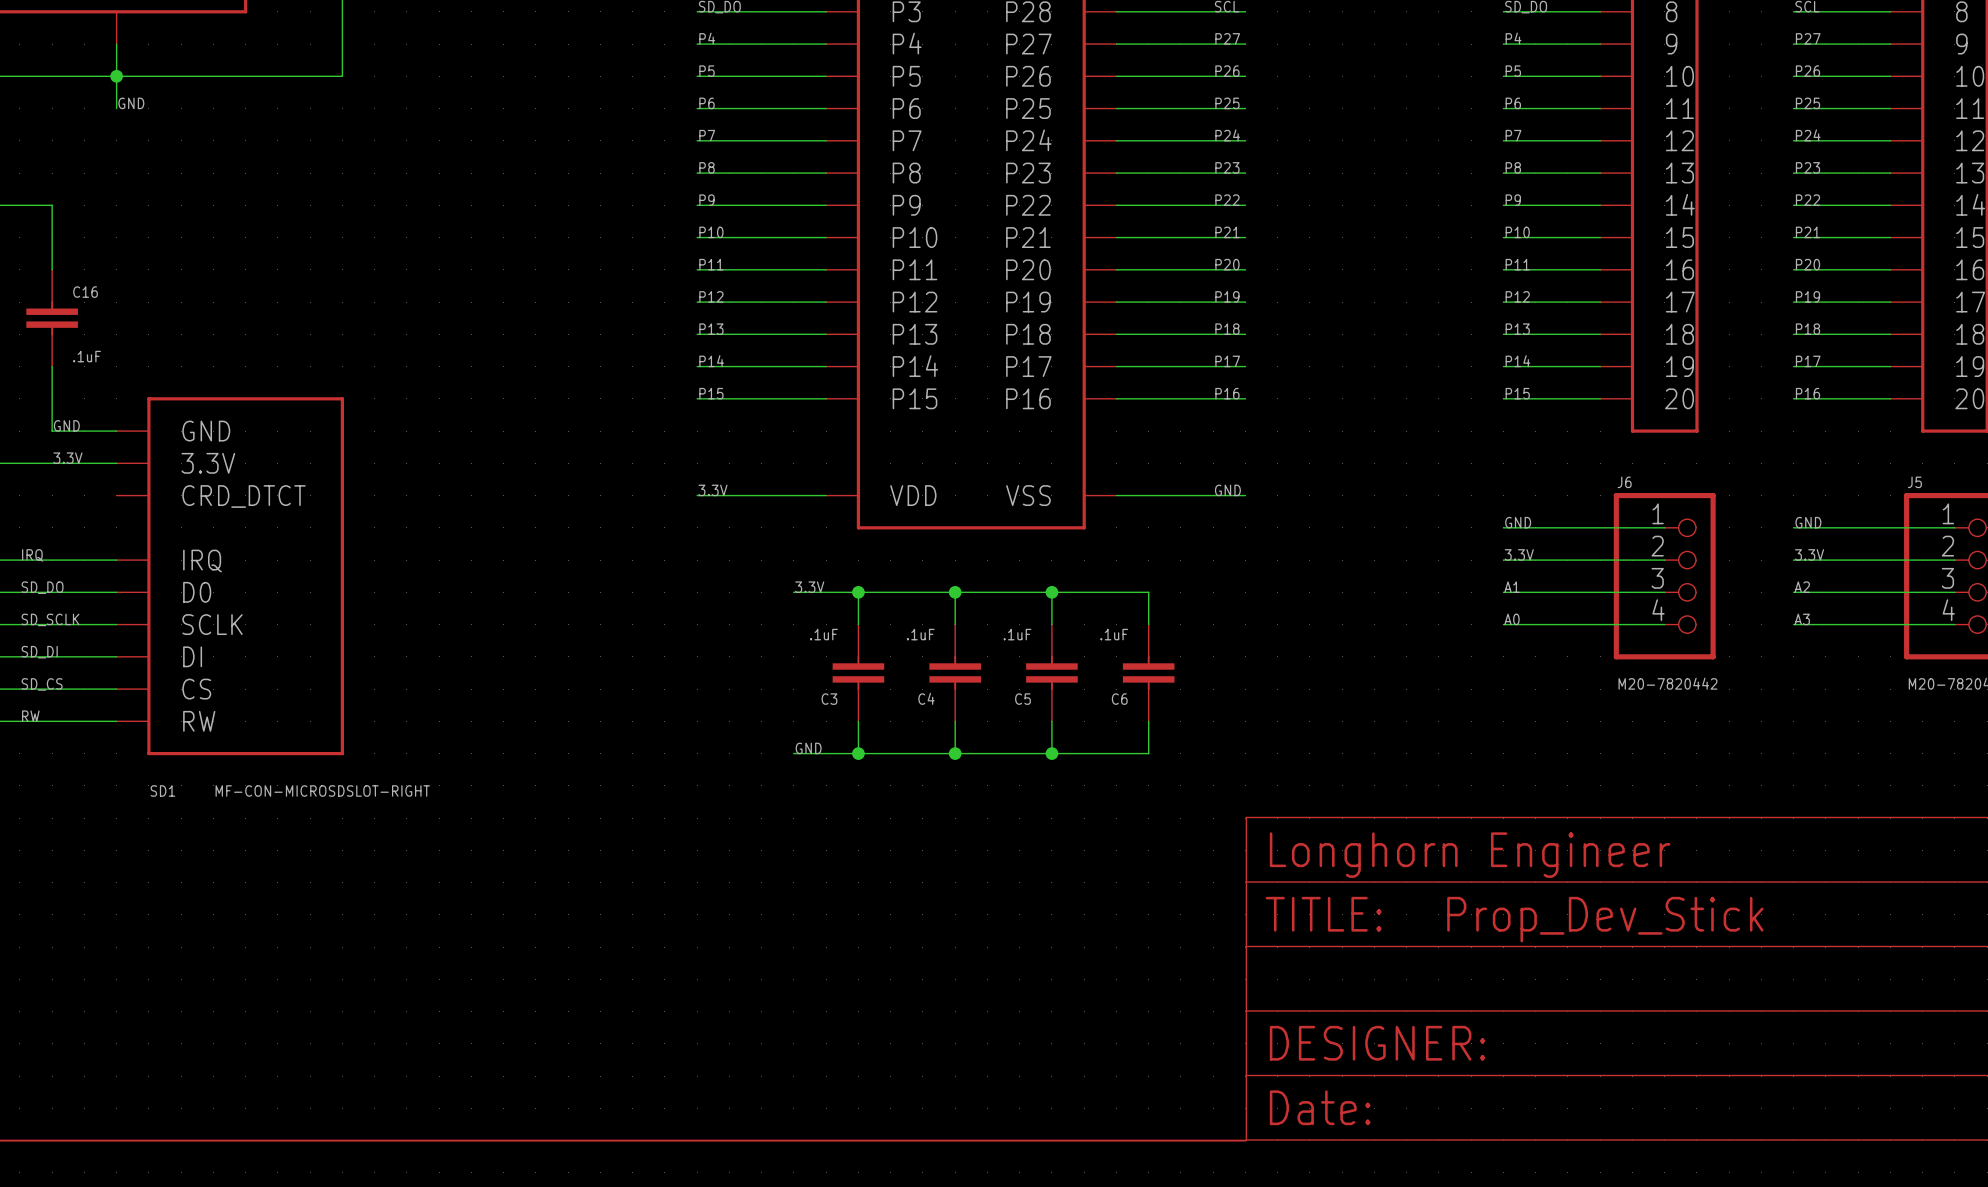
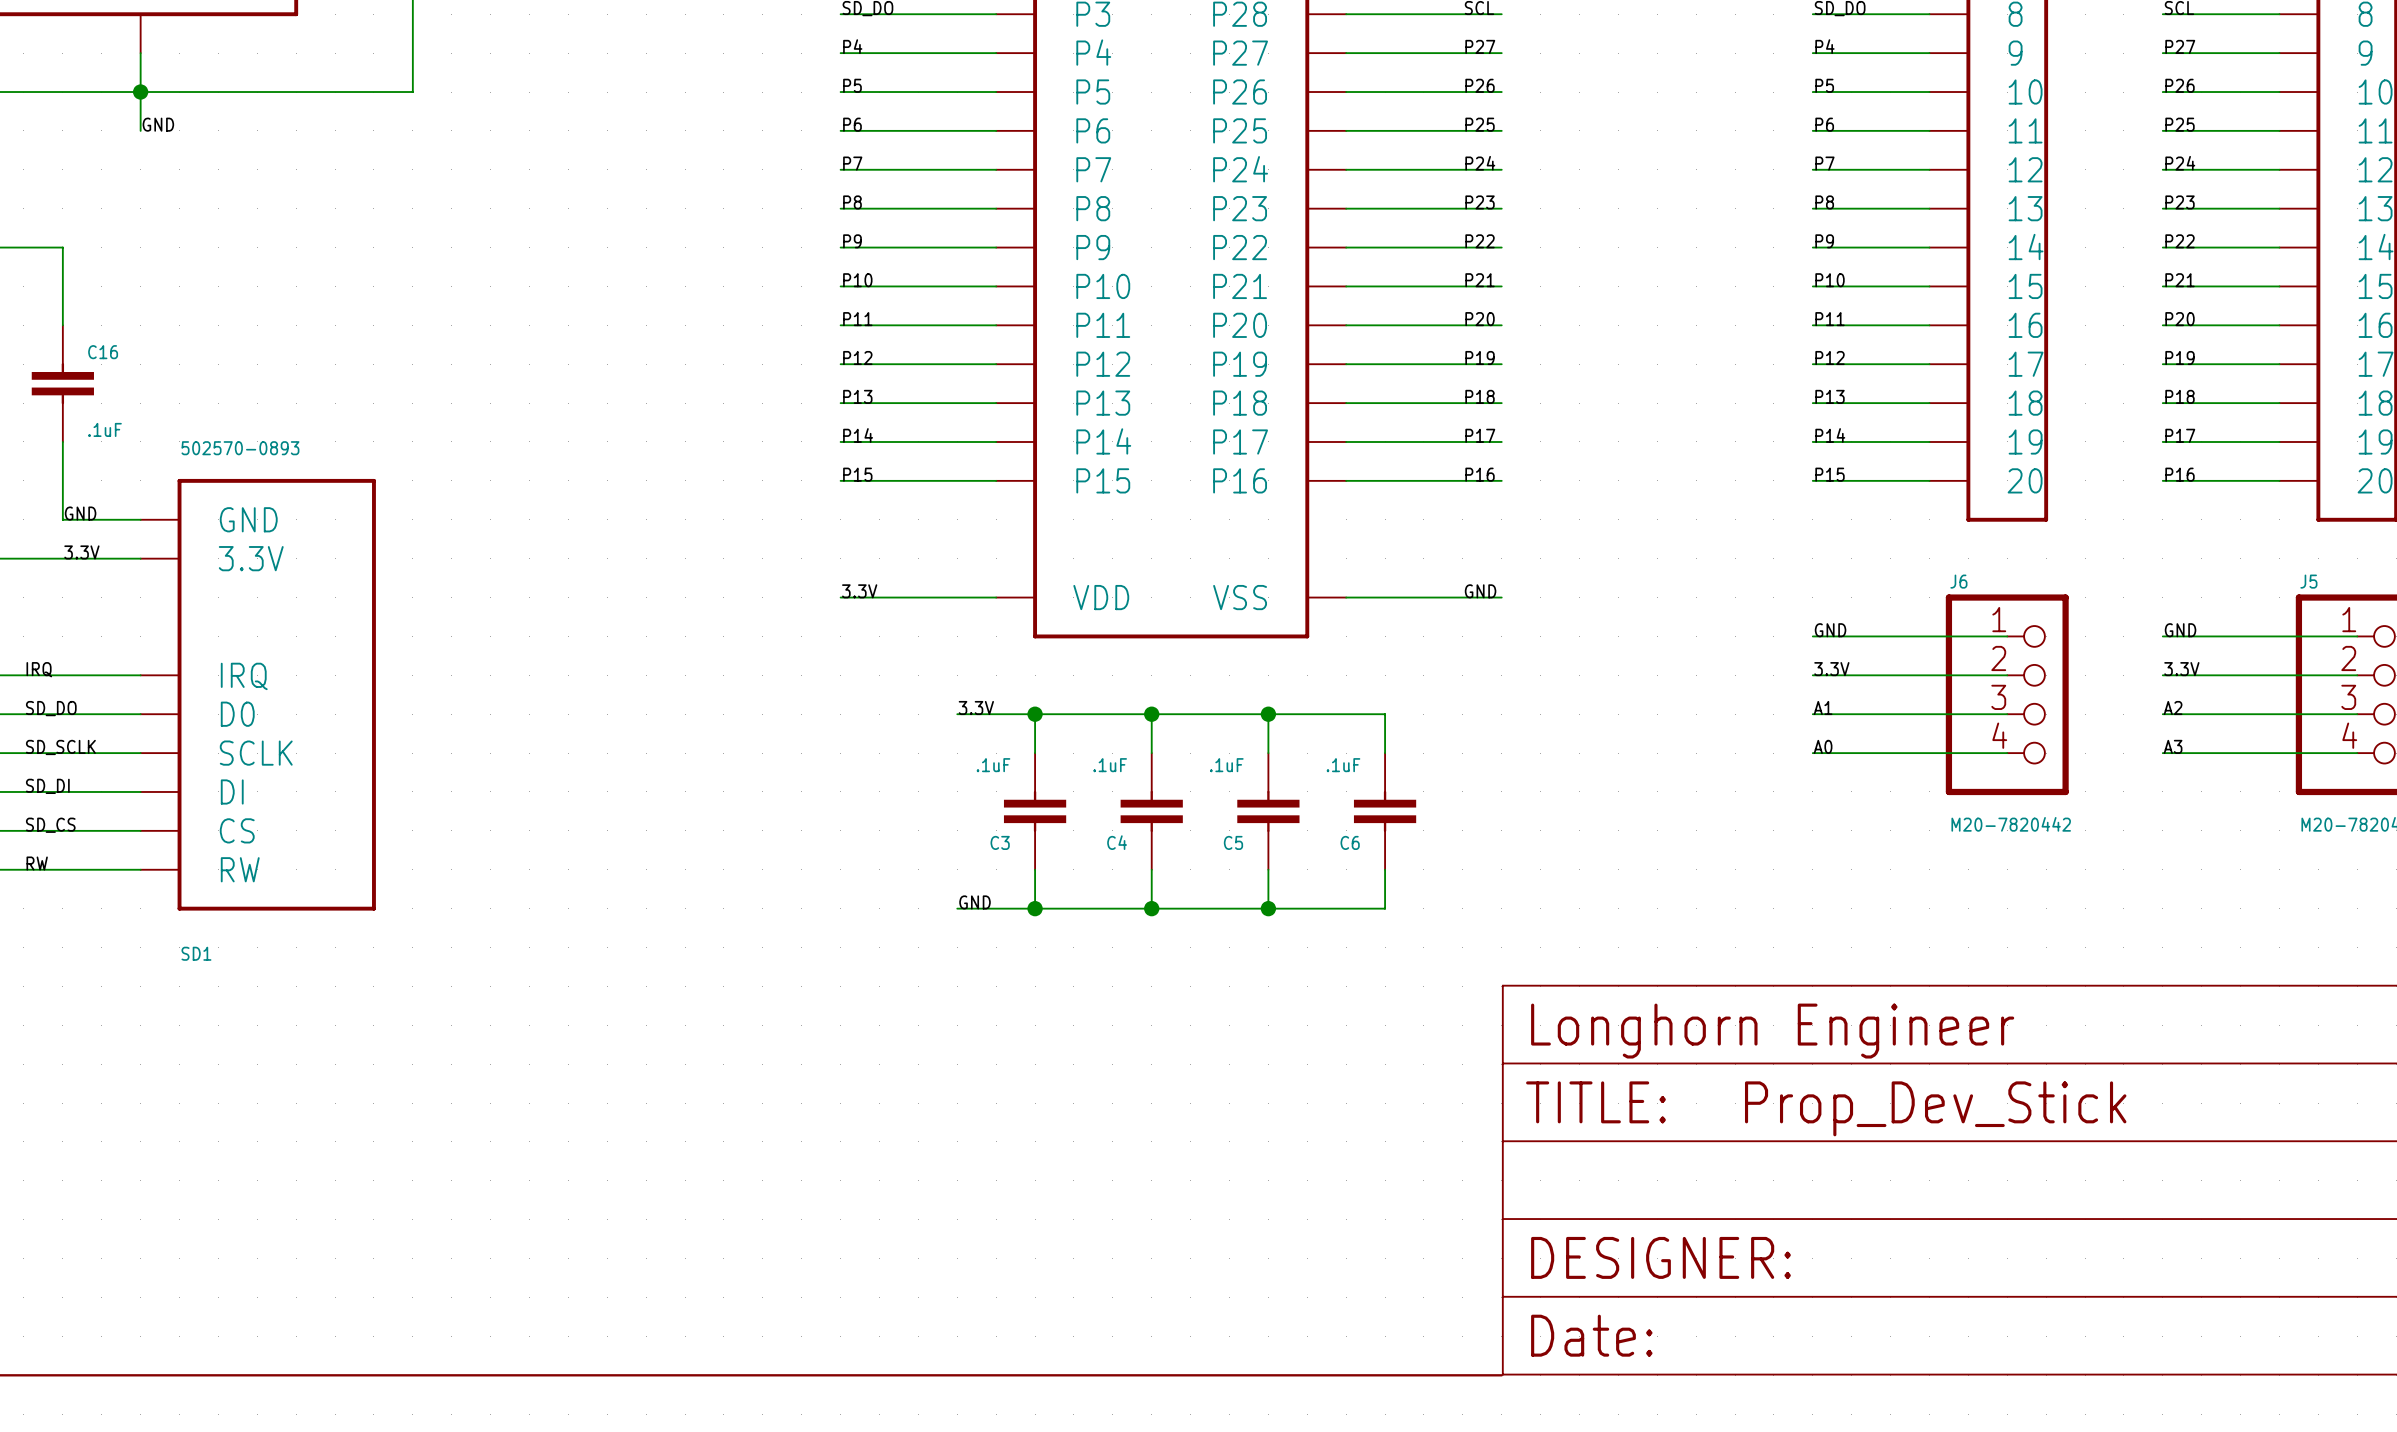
SD1 symbol: [116, 397, 345, 756] -> [140, 478, 376, 911]
SD1 value: MF-CON-MICROSDSLOT-RIGHT (322, 791) -> 502570-0893 (240, 448)

